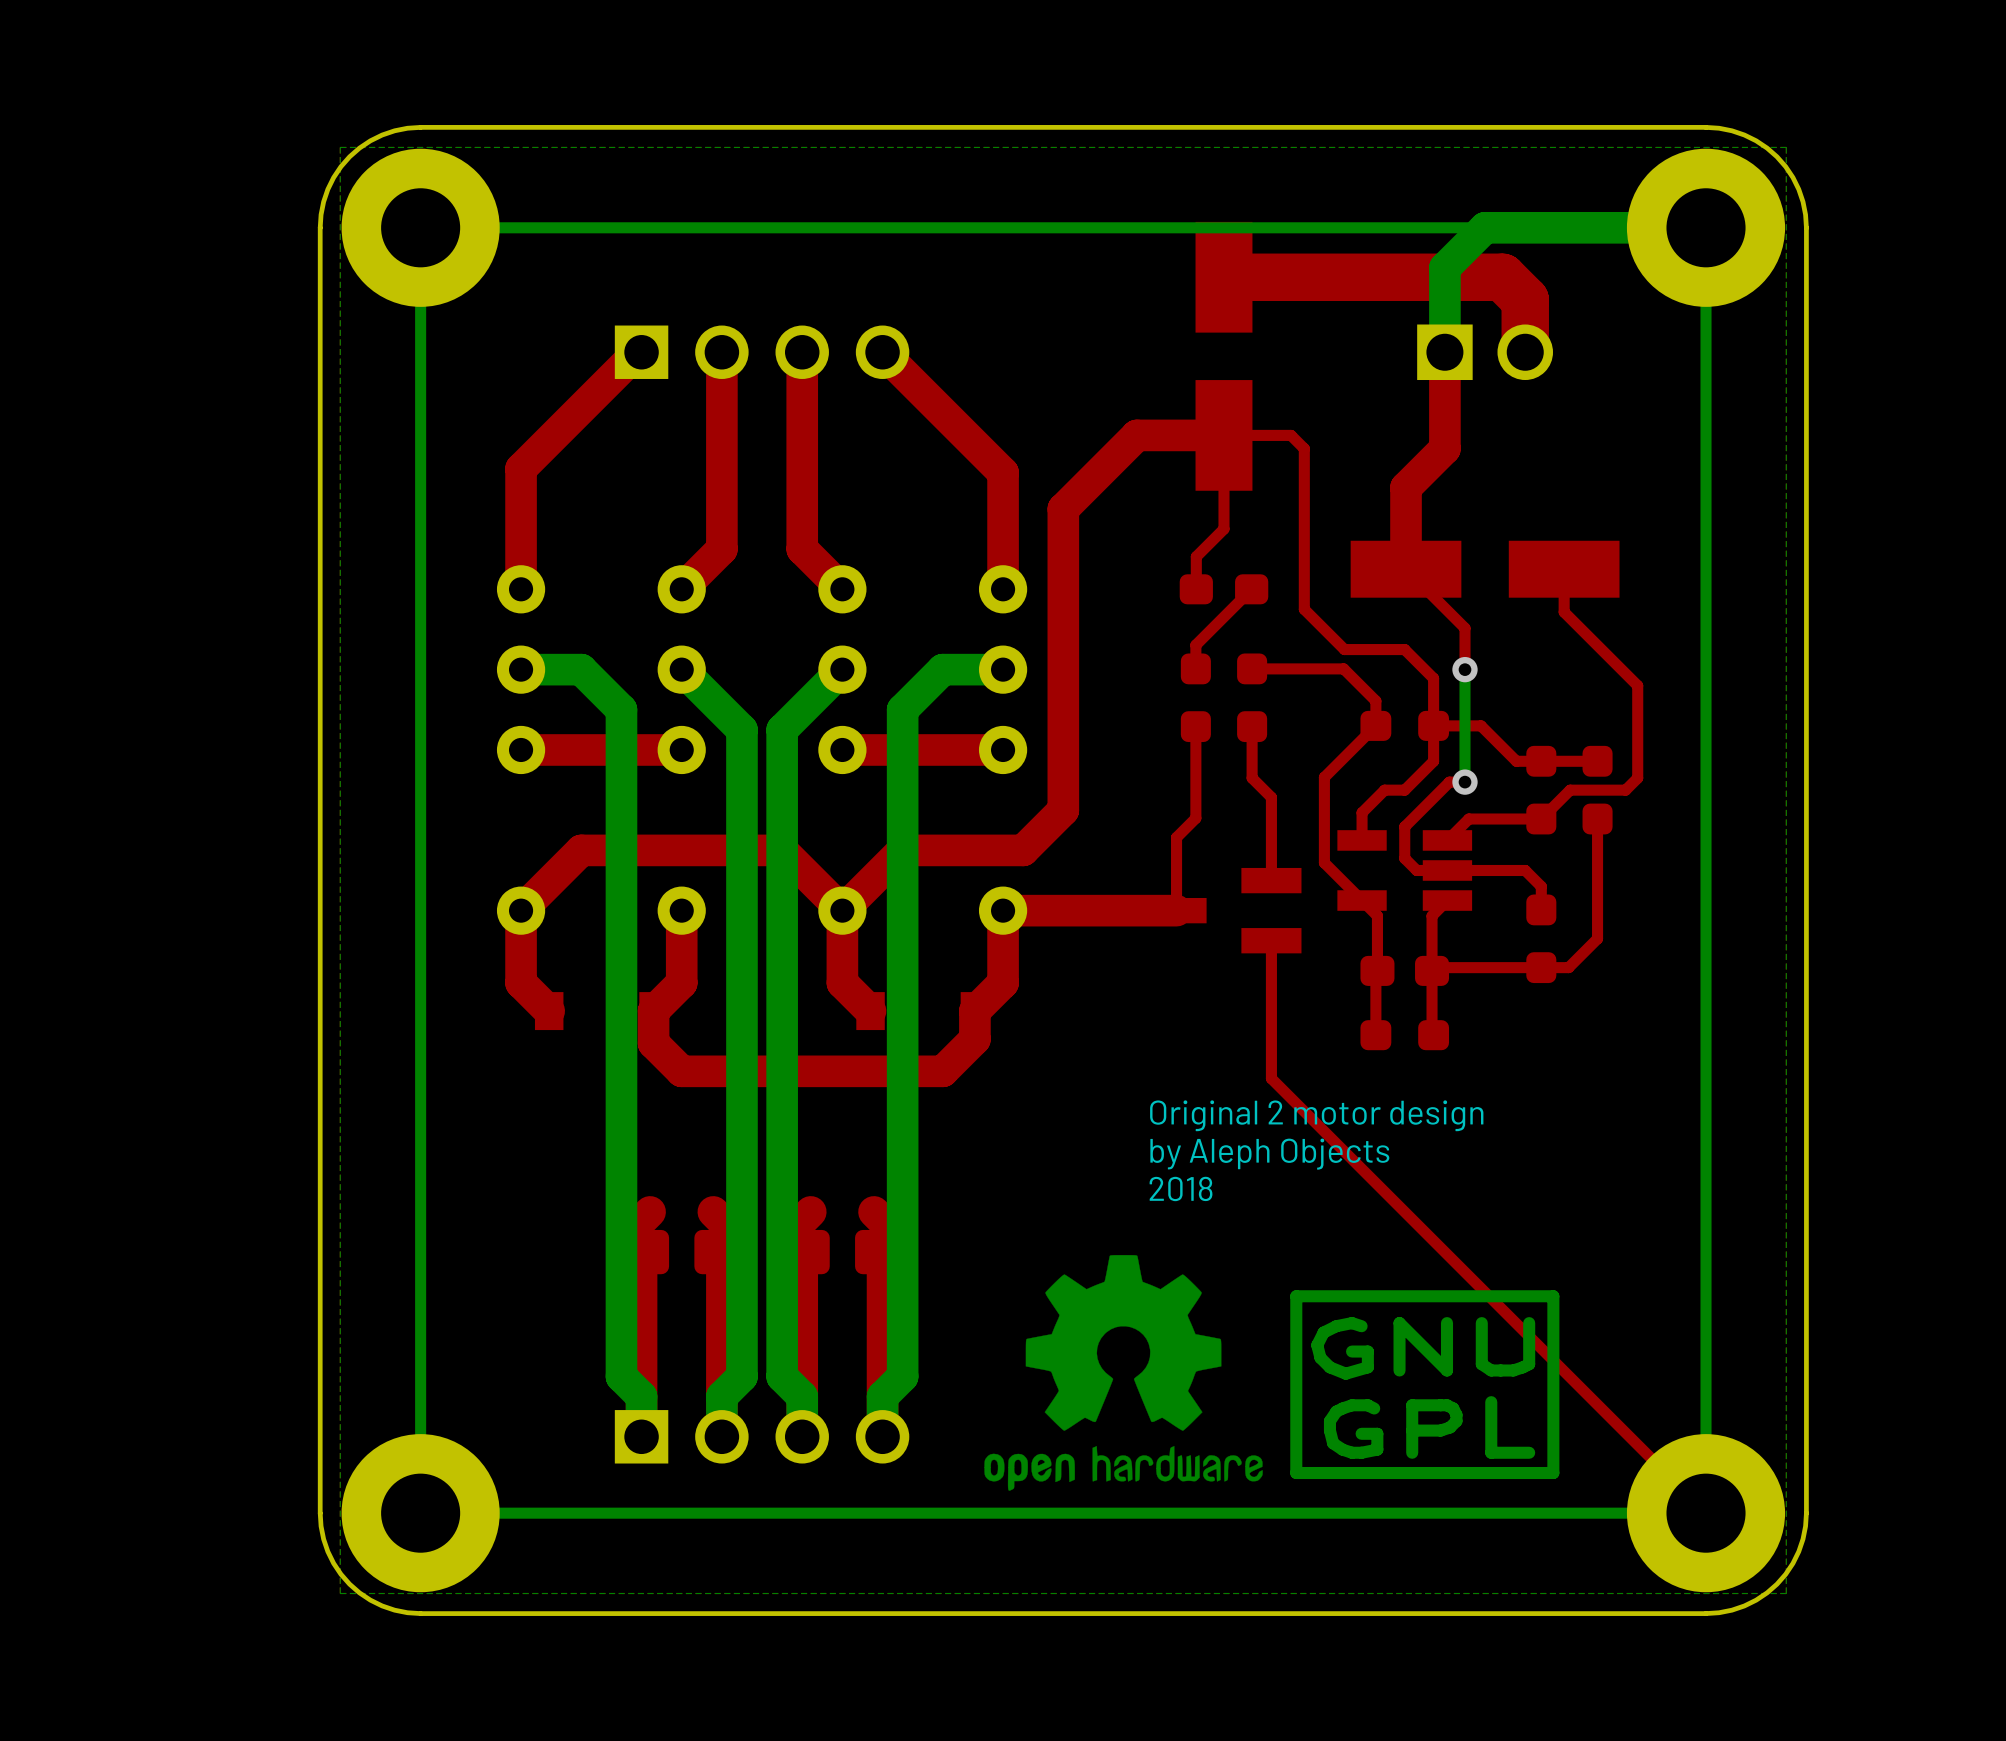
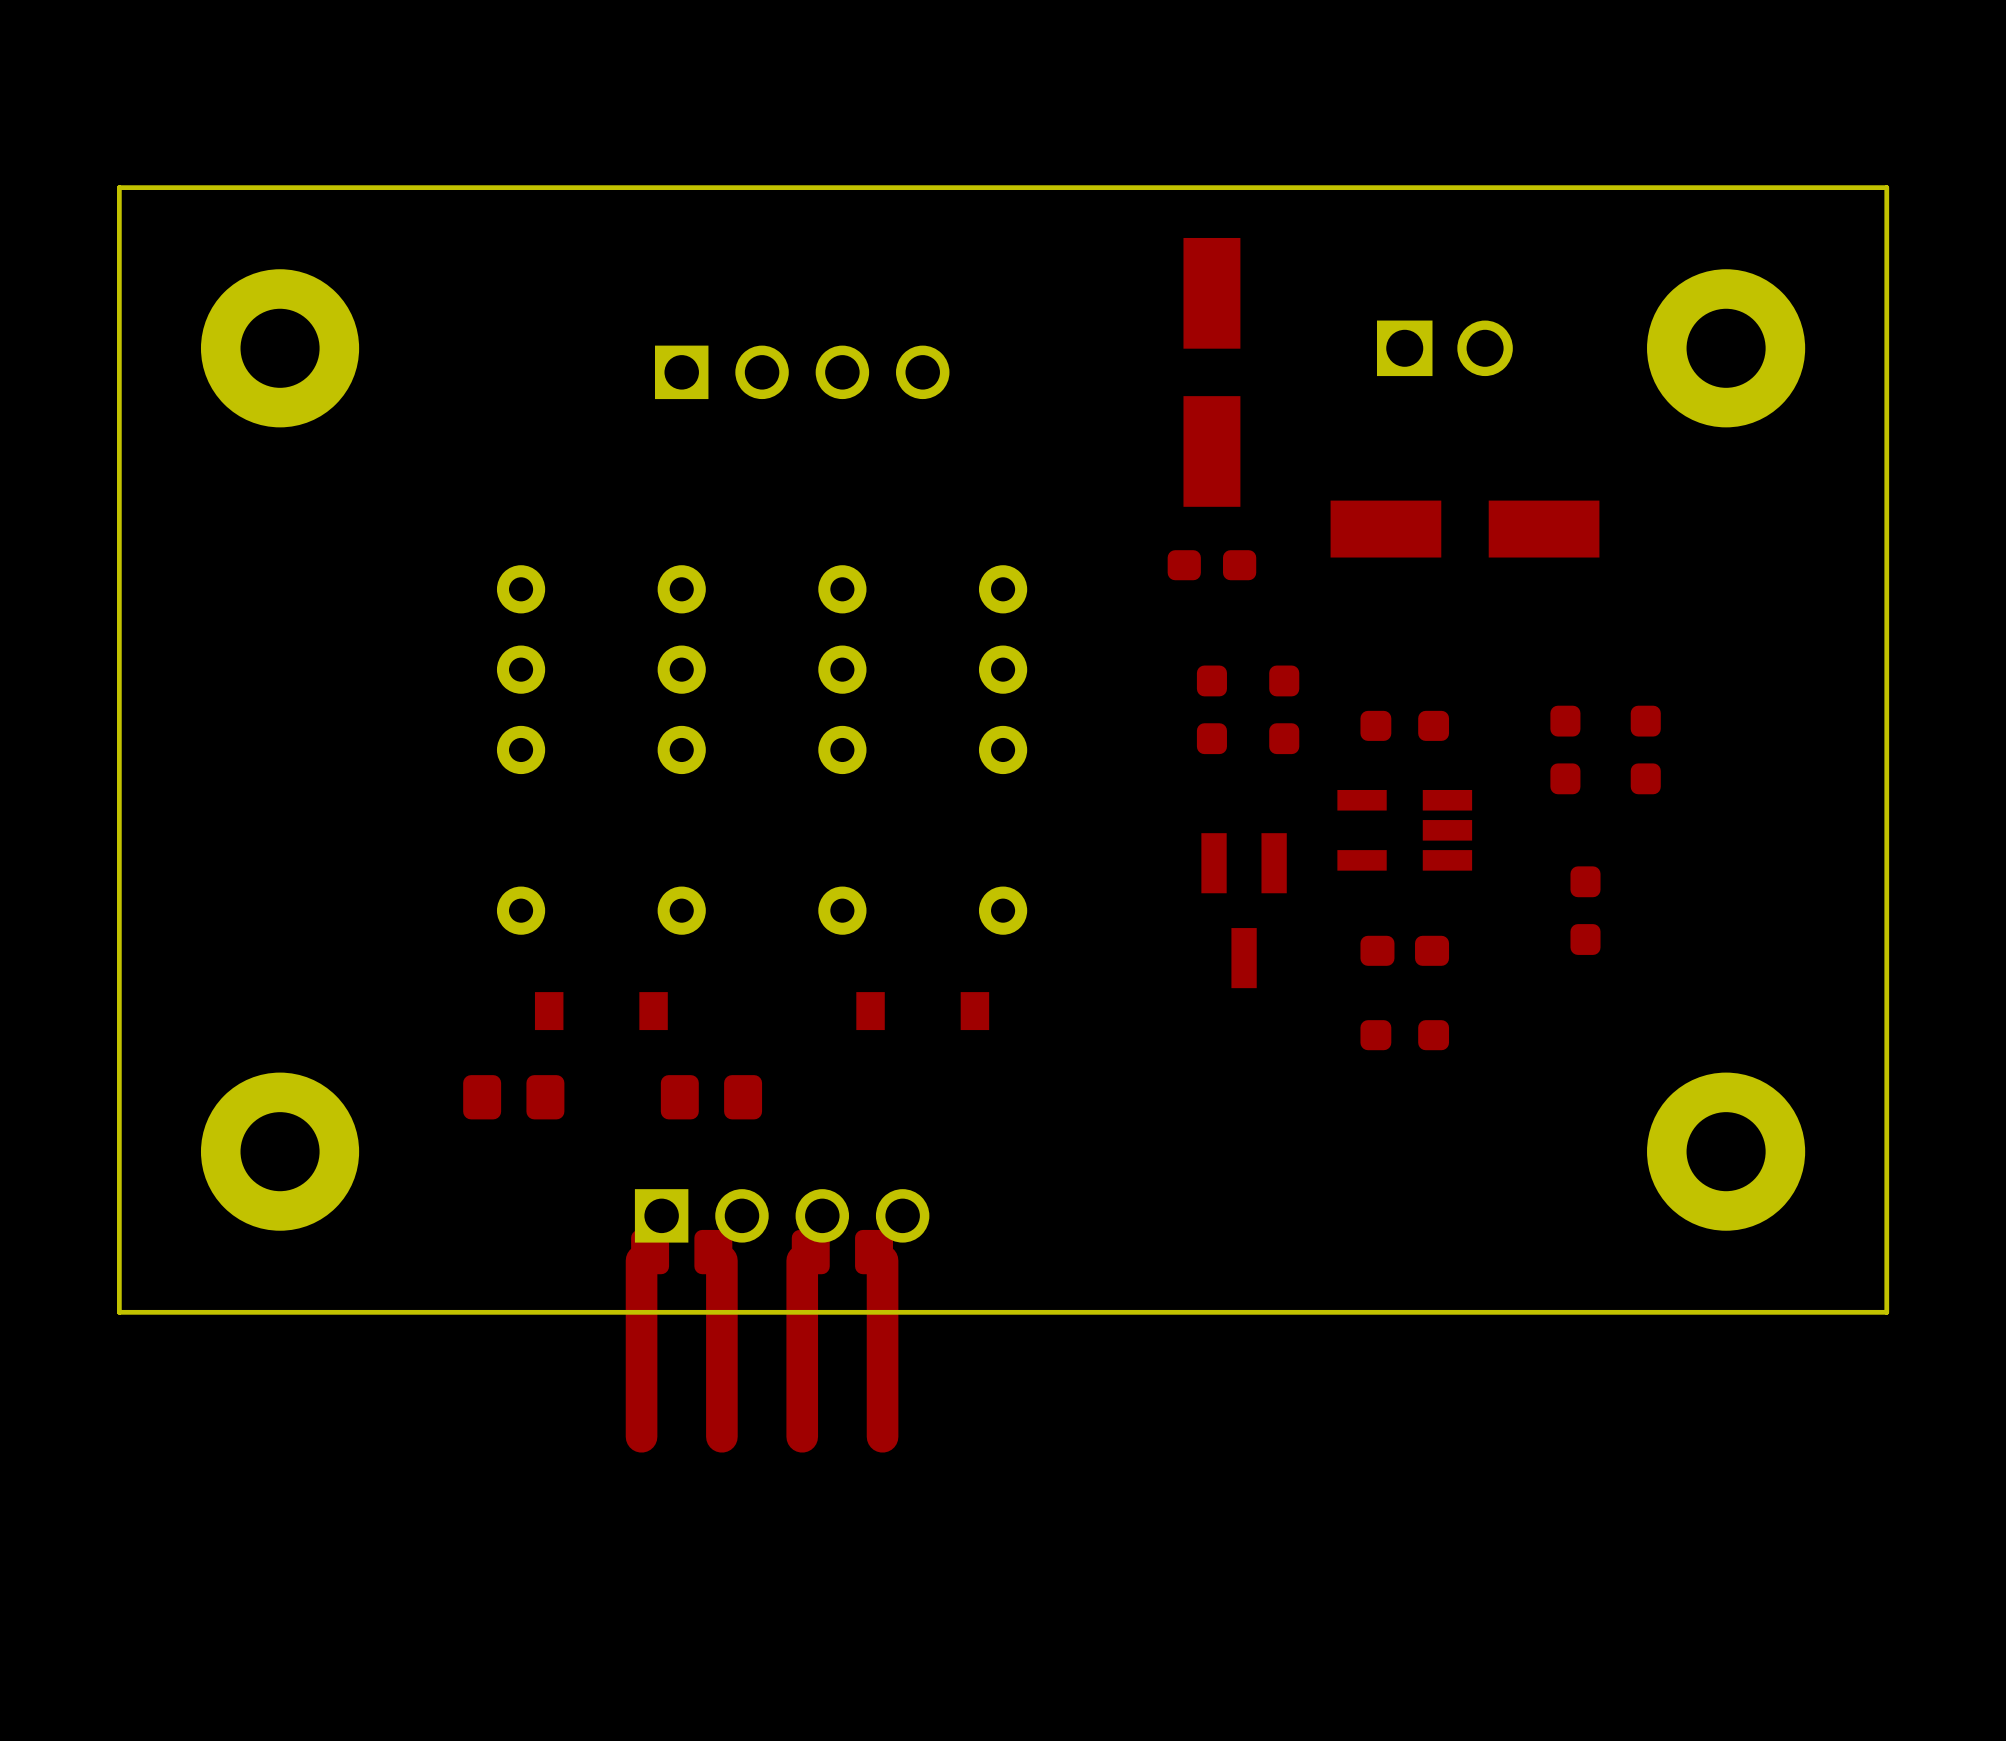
board edge: (1706, 127) (420, 127) (394, 130) (382, 135) (359, 148) (349, 156) (340, 166) (327, 189) (323, 201) (320, 227) (320, 1513) (323, 1539) (327, 1551) (340, 1574) (349, 1584) (359, 1592) (382, 1605) (394, 1610) (420, 1613) (1706, 1613) (1732, 1610) (1744, 1605) (1767, 1592) (1777, 1584) (1785, 1574) (1798, 1551) (1803, 1539) (1806, 1513) (1806, 227) (1805, 214) (1798, 189) (1792, 177) (1777, 156) (1767, 148) (1744, 135) (1732, 130) (1706, 127) -> (1886, 187) (1886, 1312) (119, 1312) (119, 187) (1886, 187)
bottom zone outline: (1786, 147) (1786, 1593) (340, 1593) (340, 147) (1786, 147) -> none
part position: (420, 227) -> (280, 348)
bottom track: (1706, 227) (420, 227) (420, 1513) (1706, 1513) (1706, 227) -> none
bottom track: (1706, 227) (1485, 227) (1444, 267) (1444, 352) -> none
part position: (1706, 227) -> (1726, 348)
top track: (1223, 277) (1502, 277) (1525, 300) (1525, 352) -> none
top track: (641, 352) (637, 352) (521, 468) (521, 589) -> none
top track: (721, 352) (721, 549) (681, 589) -> none
part position: (762, 352) -> (802, 372)
top track: (802, 352) (802, 549) (842, 589) -> none
top track: (882, 352) (1003, 472) (1003, 589) -> none
top track: (1444, 352) (1444, 448) (1406, 487) (1406, 569) (1465, 628) (1465, 669) -> none
part position: (1485, 352) -> (1444, 348)
part position: (1223, 356) -> (1211, 372)
top track: (1223, 435) (1223, 529) (1196, 556) (1196, 589) -> none
top track: (1223, 435) (1291, 435) (1304, 448) (1304, 609) (1344, 649) (1404, 649) (1433, 678) (1433, 761) (1404, 790) (1384, 790) (1362, 812) (1362, 840) -> none
top track: (1223, 435) (1136, 435) (1063, 508) (1063, 810) (1023, 850) (902, 850) (842, 910) -> none
part position: (1485, 569) -> (1465, 529)
top track: (1564, 569) (1564, 612) (1637, 685) (1637, 778) (1625, 790) (1570, 790) (1541, 819) (1468, 819) (1447, 840) -> none
part position: (1223, 589) -> (1211, 565)
top track: (1251, 589) (1195, 645) (1195, 668) -> none
top track: (1252, 668) (1343, 668) (1375, 701) (1375, 725) (1324, 777) (1324, 862) (1377, 915) (1375, 1035) -> none
bottom track: (521, 669) (581, 669) (621, 709) (621, 1376) (641, 1396) (641, 1436) -> none
bottom track: (681, 669) (741, 729) (741, 1376) (721, 1396) (721, 1436) -> none
bottom track: (842, 669) (782, 729) (782, 1376) (802, 1396) (802, 1436) -> none
bottom track: (1003, 669) (942, 669) (902, 709) (902, 1376) (882, 1396) (882, 1436) -> none
bottom track: (1465, 669) (1465, 782) -> none
via: (1465, 669) -> none
part position: (1195, 697) -> (1211, 709)
part position: (1252, 697) -> (1284, 709)
top track: (1433, 725) (1481, 725) (1516, 761) (1597, 761) -> none
top track: (1195, 726) (1195, 818) (1176, 837) (1176, 910) (1003, 910) (1003, 982) (974, 1011) (974, 1039) (942, 1071) (681, 1071) (653, 1043) (653, 1011) (681, 982) (681, 910) -> none
top track: (1252, 726) (1252, 778) (1271, 797) (1271, 880) -> none
top track: (681, 749) (521, 749) -> none
top track: (1003, 749) (842, 749) -> none
part: none -> (1565, 749)
part: none -> (1645, 749)
top track: (1465, 782) (1449, 782) (1404, 826) (1404, 858) (1416, 870) (1525, 870) (1541, 886) (1541, 909) -> none
via: (1465, 782) -> none
part: (1541, 790) -> none
part: (1597, 790) -> none
top track: (1597, 819) (1597, 938) (1568, 967) (1435, 967) (1432, 970) -> none
part position: (1404, 870) -> (1404, 830)
top track: (1447, 900) (1432, 915) (1432, 1033) (1433, 1035) -> none
top track: (842, 910) (842, 982) (870, 1011) -> none
top track: (842, 910) (782, 850) (581, 850) (521, 910) (521, 982) (549, 1011) -> none
part rotation: 0° (1223, 910) -> 90° counterclockwise (1244, 910)
part position: (1541, 938) -> (1585, 910)
top track: (1271, 940) (1271, 1078) (1706, 1513) -> none
part position: (1404, 970) -> (1404, 950)
part: none -> (513, 1097)
part: none -> (711, 1097)
text: Original 2 motor design (1316, 1115) -> none
text: by Aleph Objects (1269, 1154) -> none
text: 2018 (1181, 1188) -> none
top track: (650, 1211) (641, 1220) -> none
top track: (713, 1211) (721, 1220) -> none
top track: (810, 1211) (802, 1220) -> none
top track: (874, 1211) (882, 1220) -> none
drawing: [984, 1255, 1560, 1491] -> none
part position: (762, 1436) -> (782, 1215)
part position: (420, 1513) -> (280, 1151)
part position: (1706, 1513) -> (1726, 1151)

